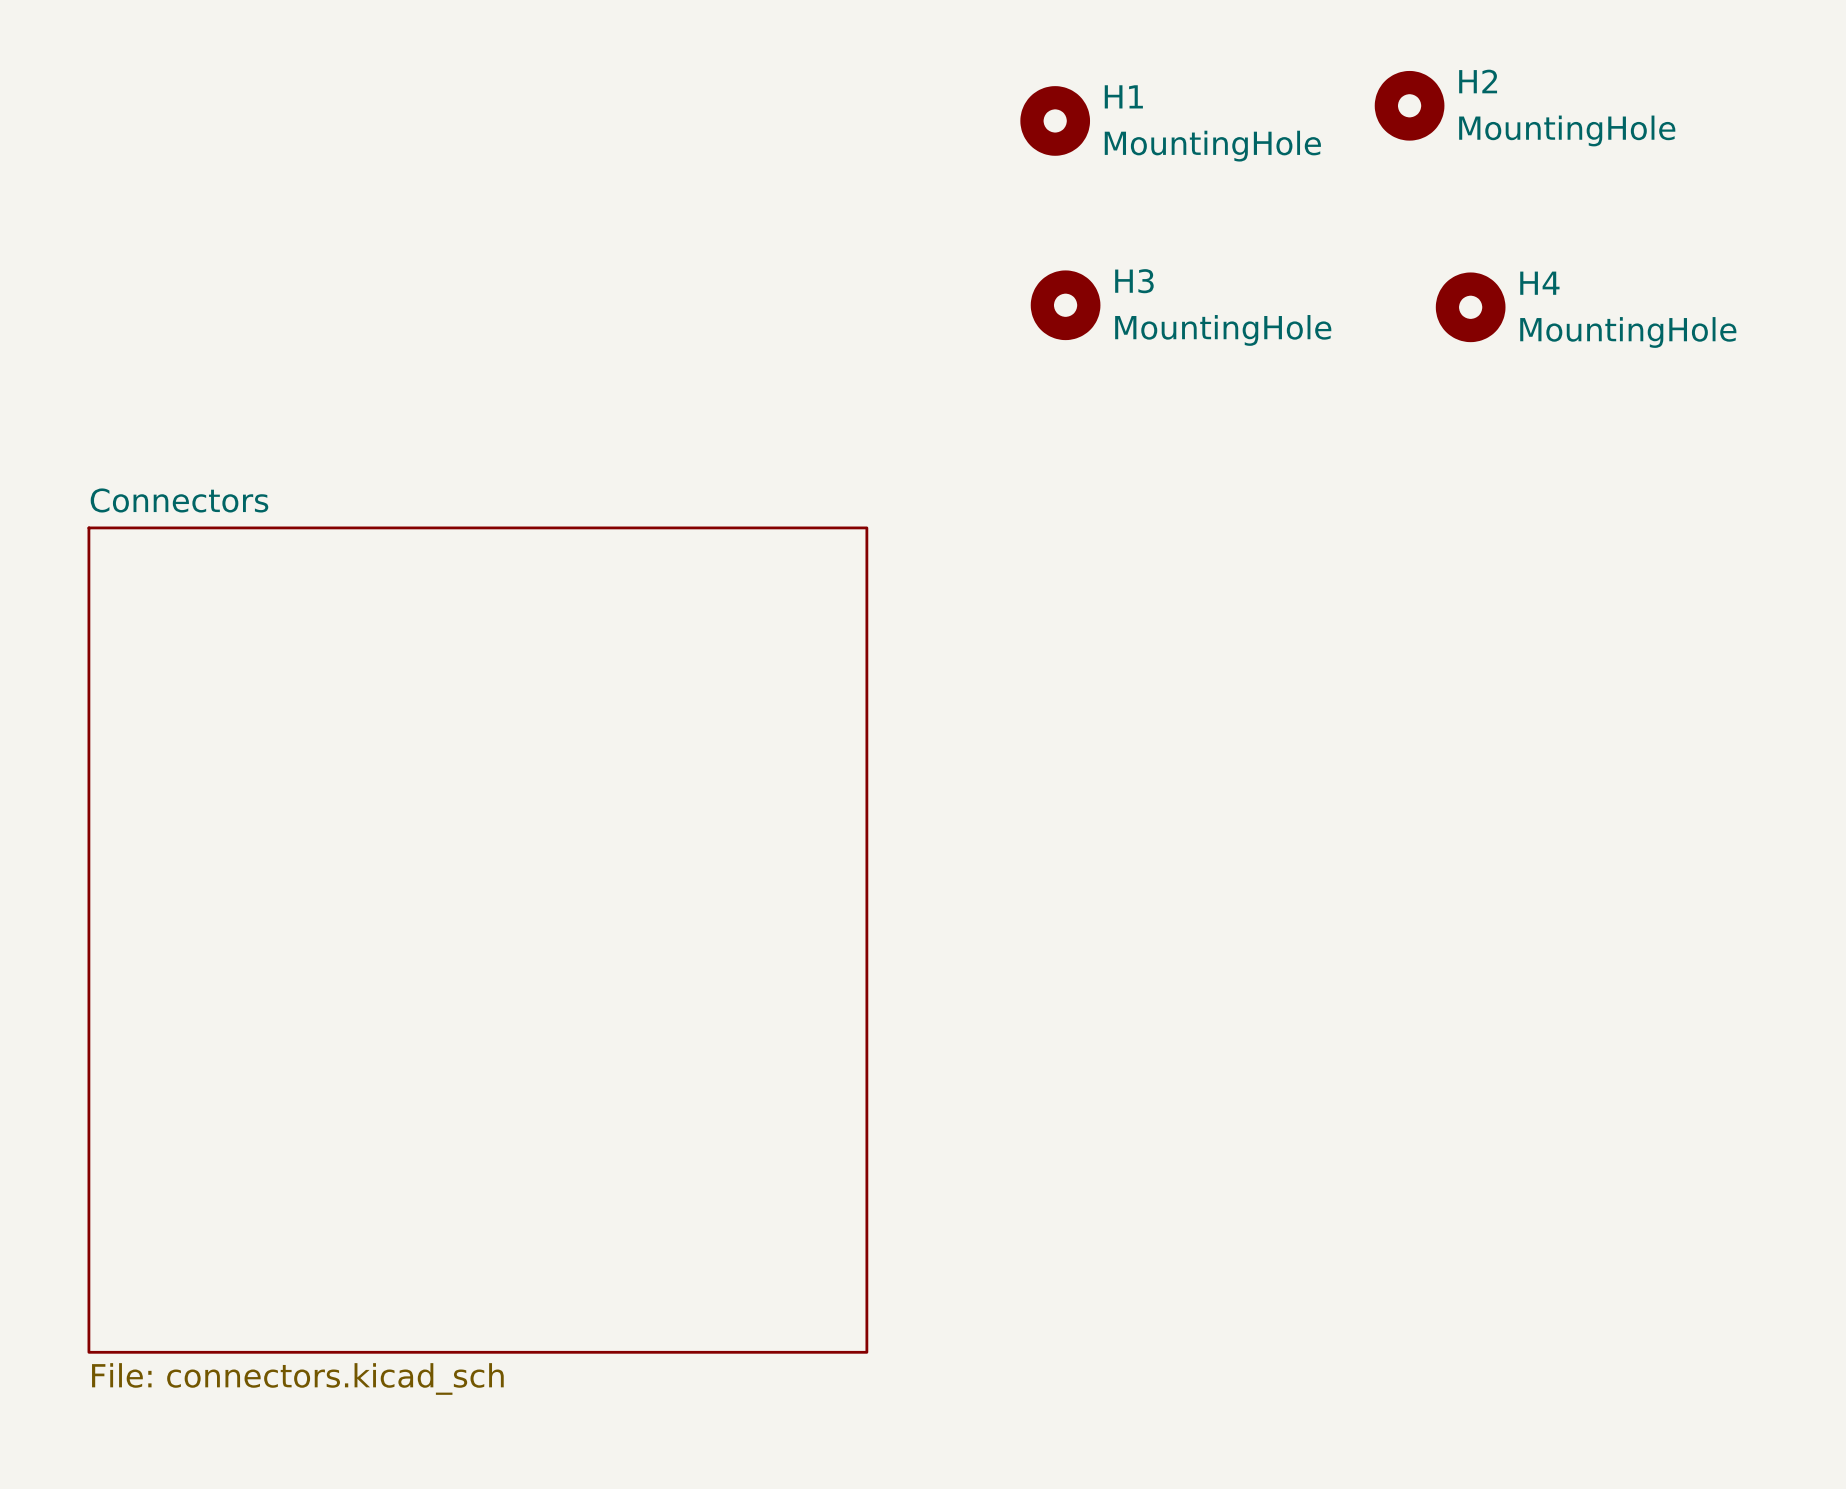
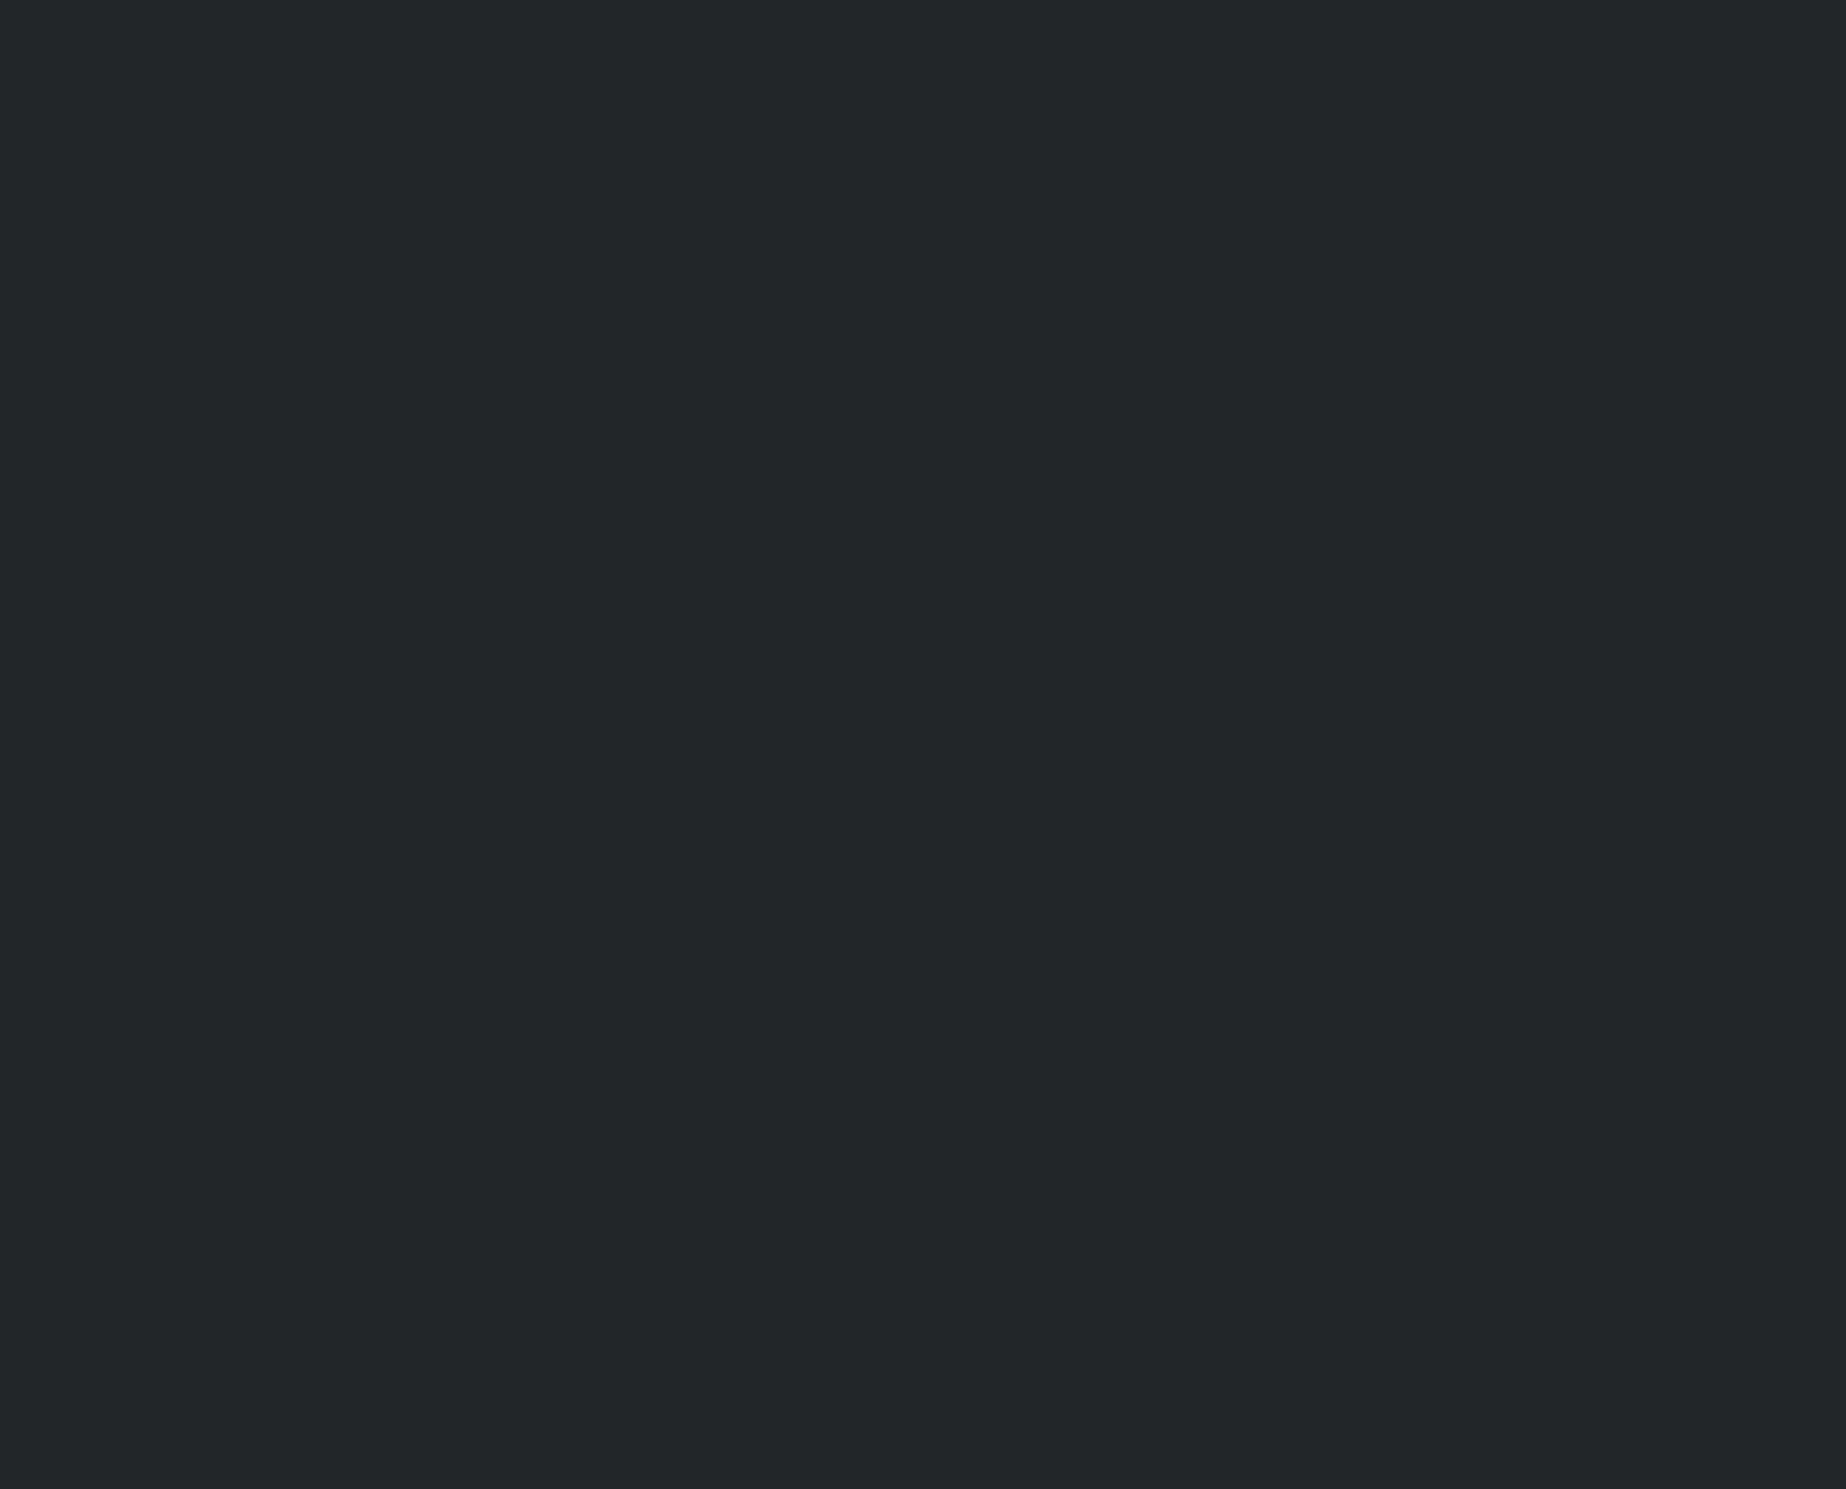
H2: MountingHole (1409, 105) -> none
H1: MountingHole (1055, 120) -> none
H3: MountingHole (1065, 305) -> none
H4: MountingHole (1470, 307) -> none
sheet Connectors: File: connectors.kicad_sch (477, 940) -> none

